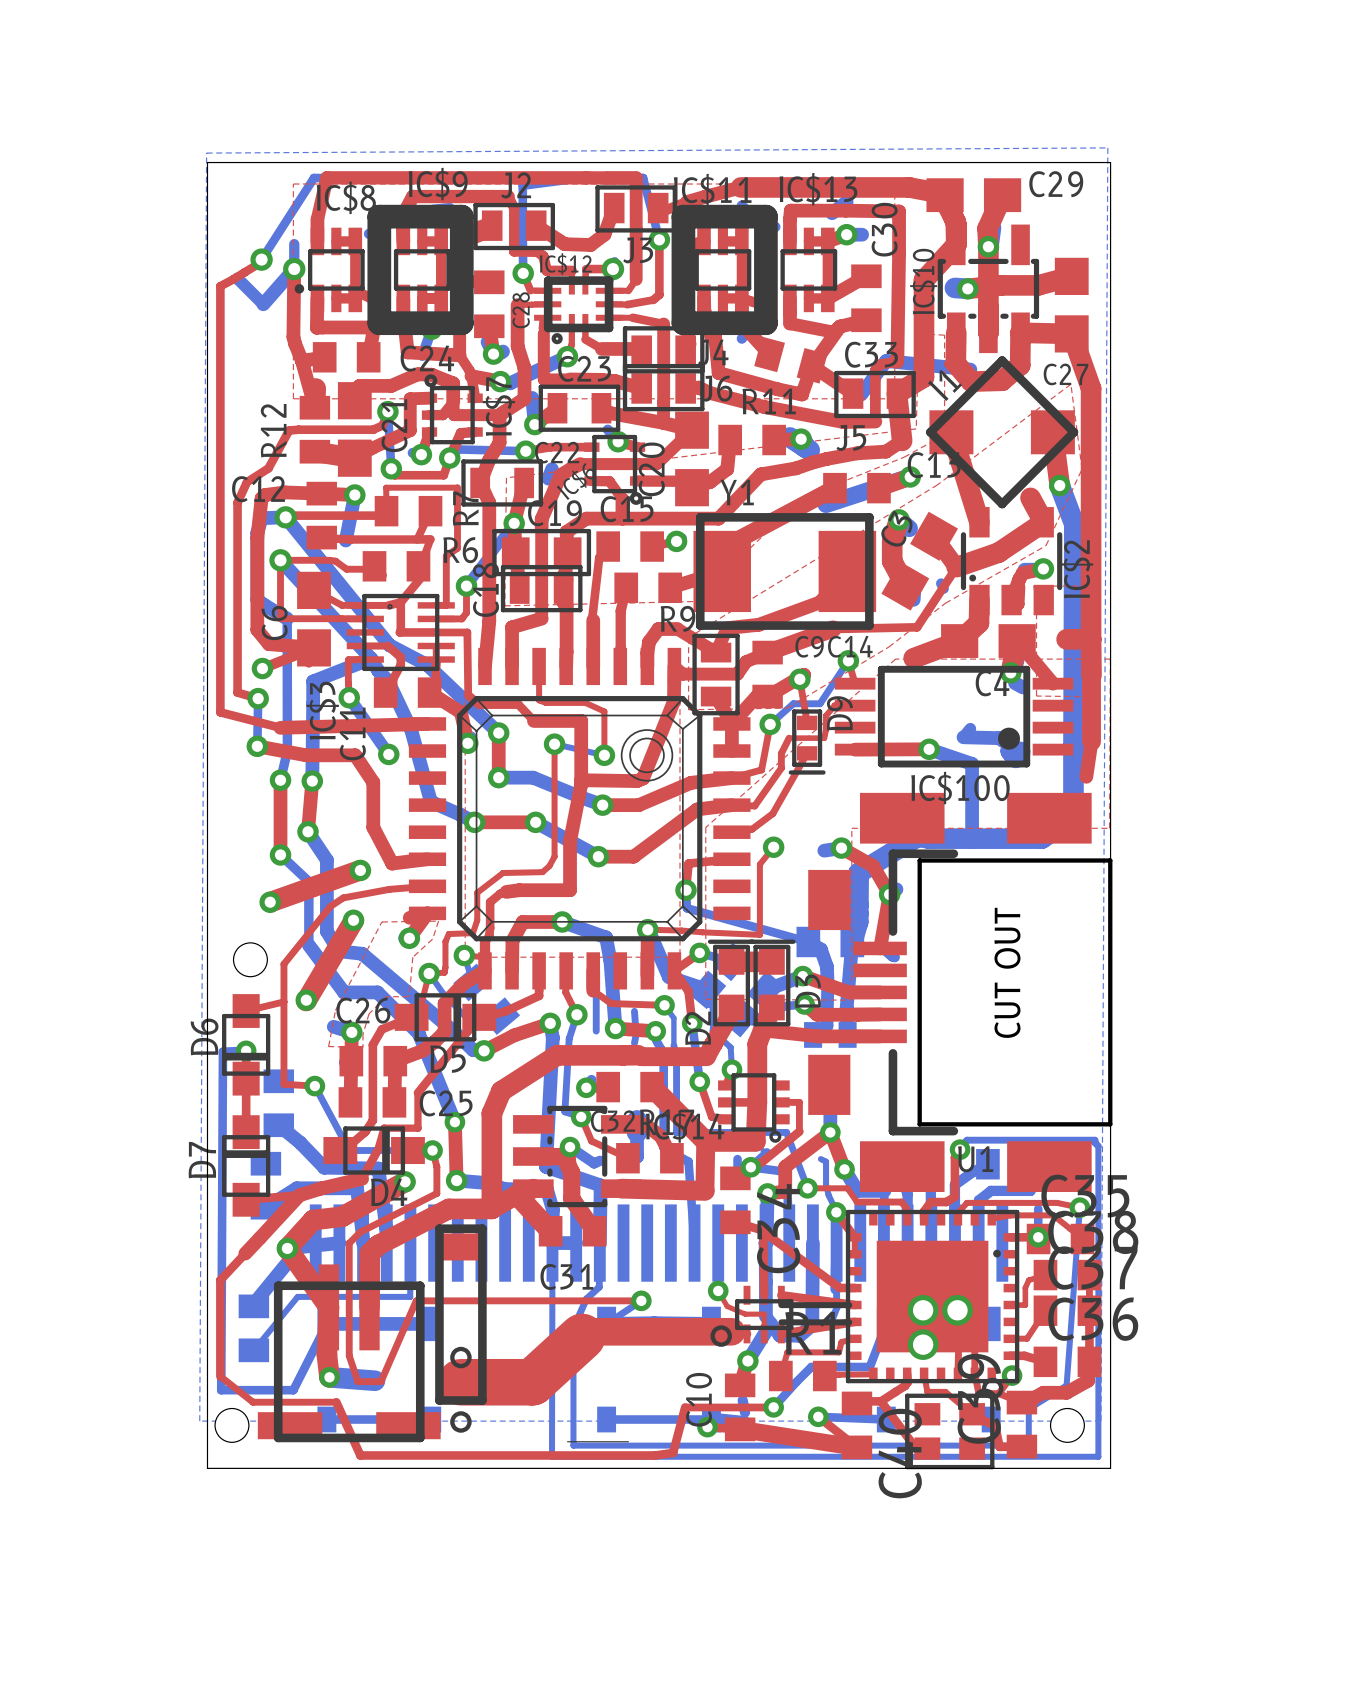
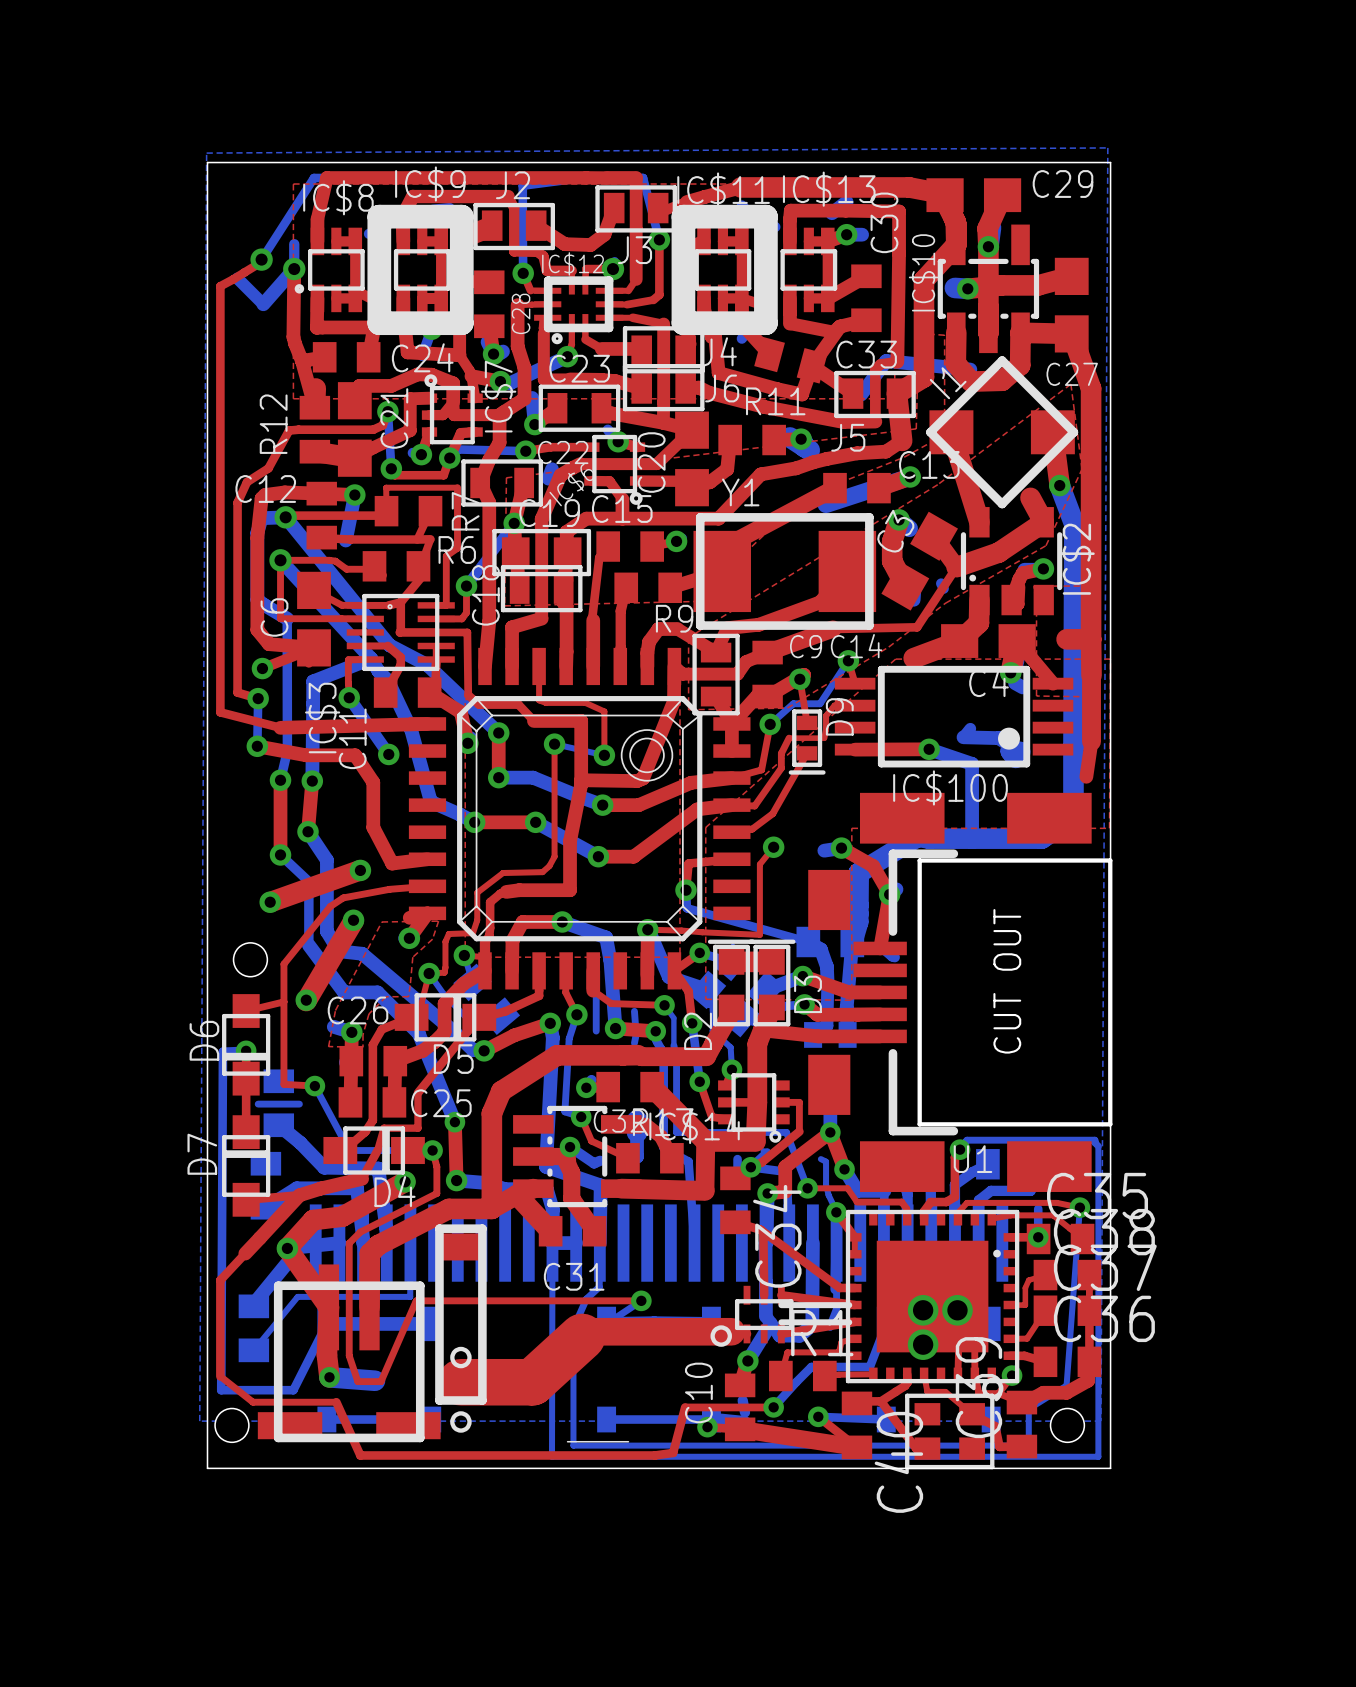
bottom track: none -> (258, 1104) (299, 1104)
top track: (718, 1290) (727, 1306) (745, 1314) (764, 1314) (764, 1333) -> none
via: (718, 1290) -> none

